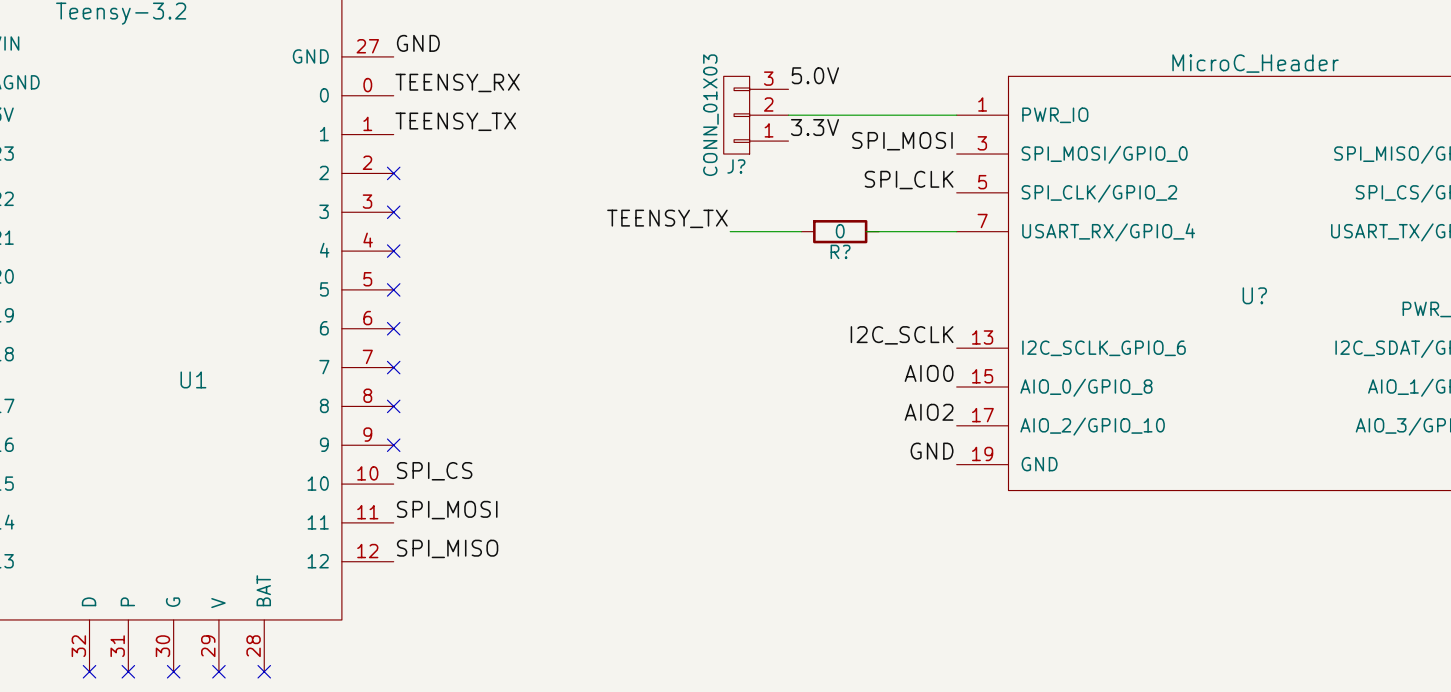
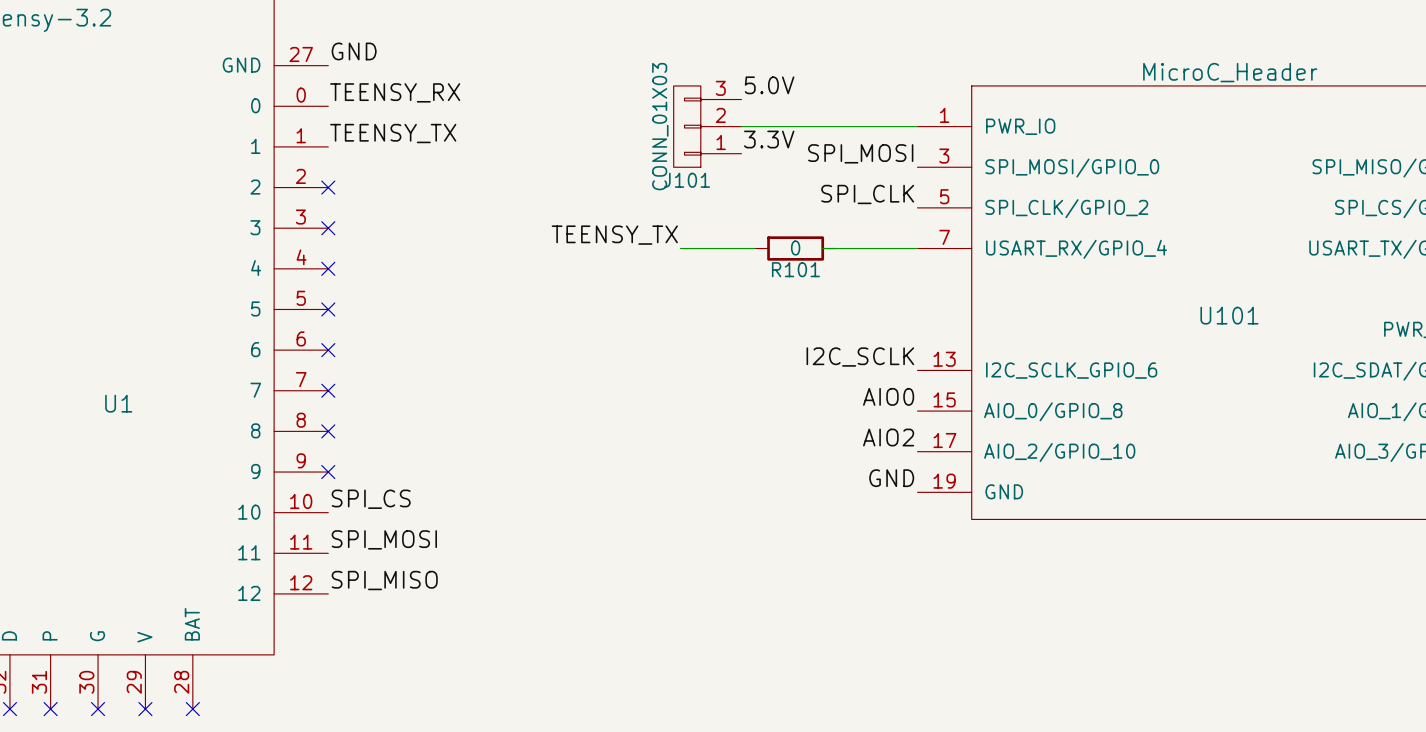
J? name: J? (736, 166) -> J101 (686, 180)
R? name: R? (840, 251) -> R101 (795, 269)
U? name: U? (1254, 295) -> U101 (1229, 315)

